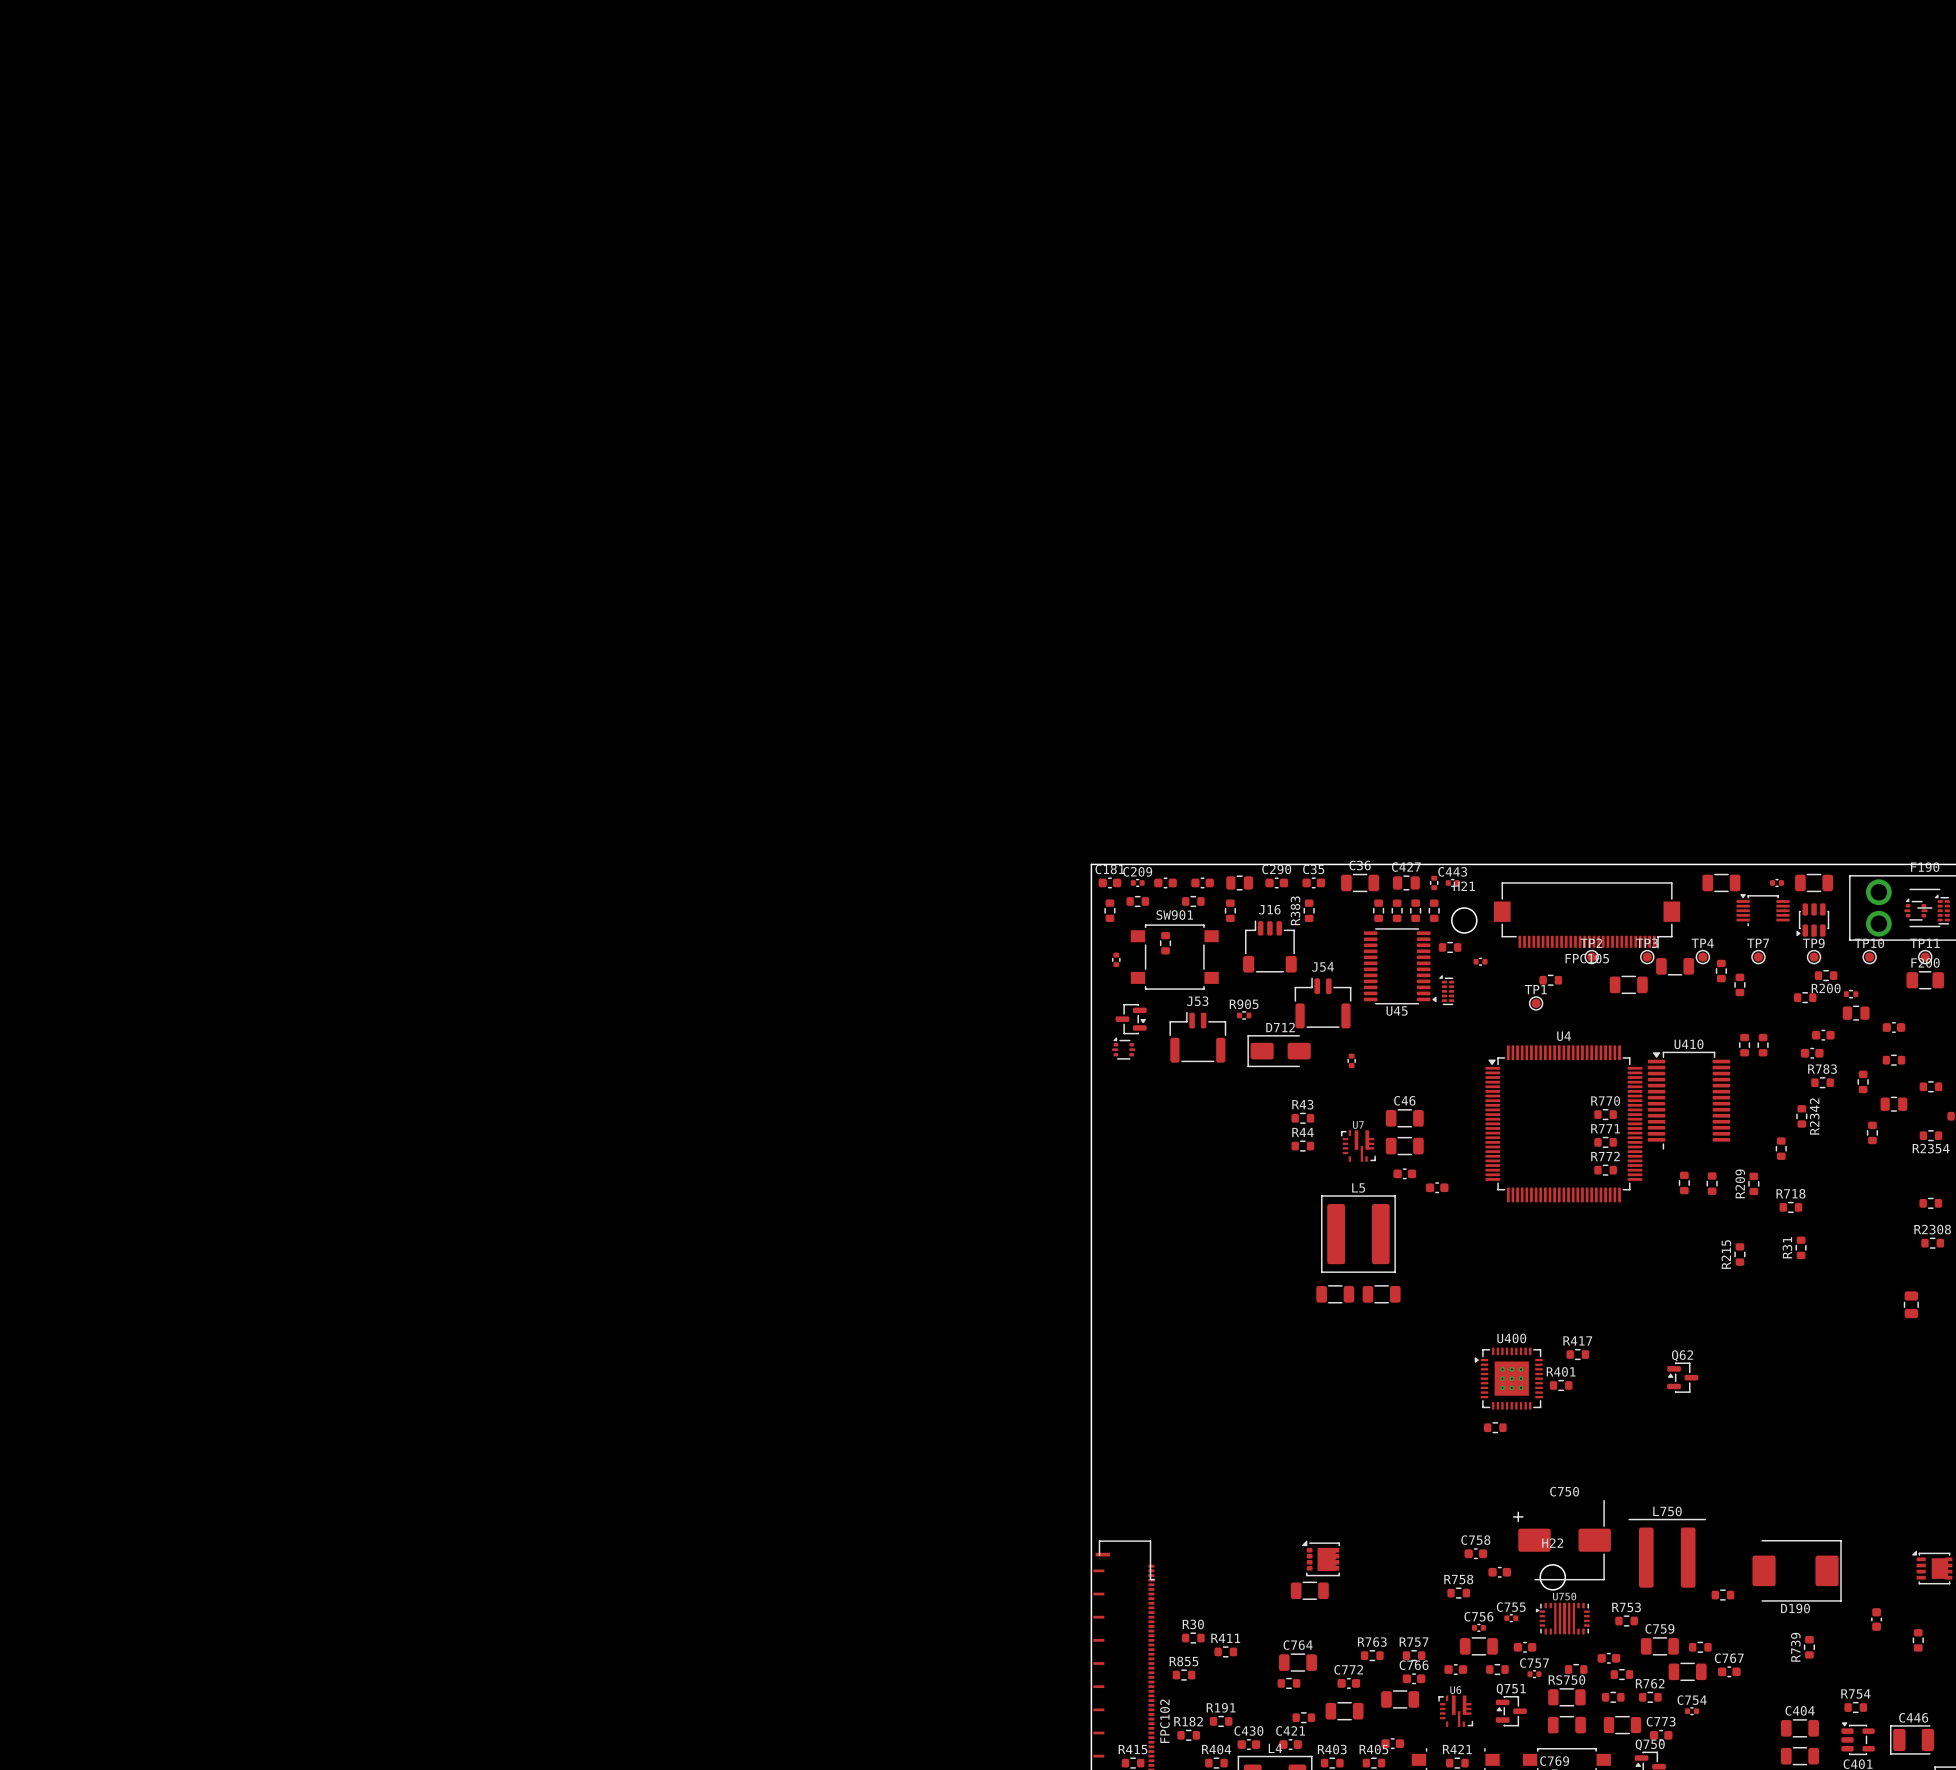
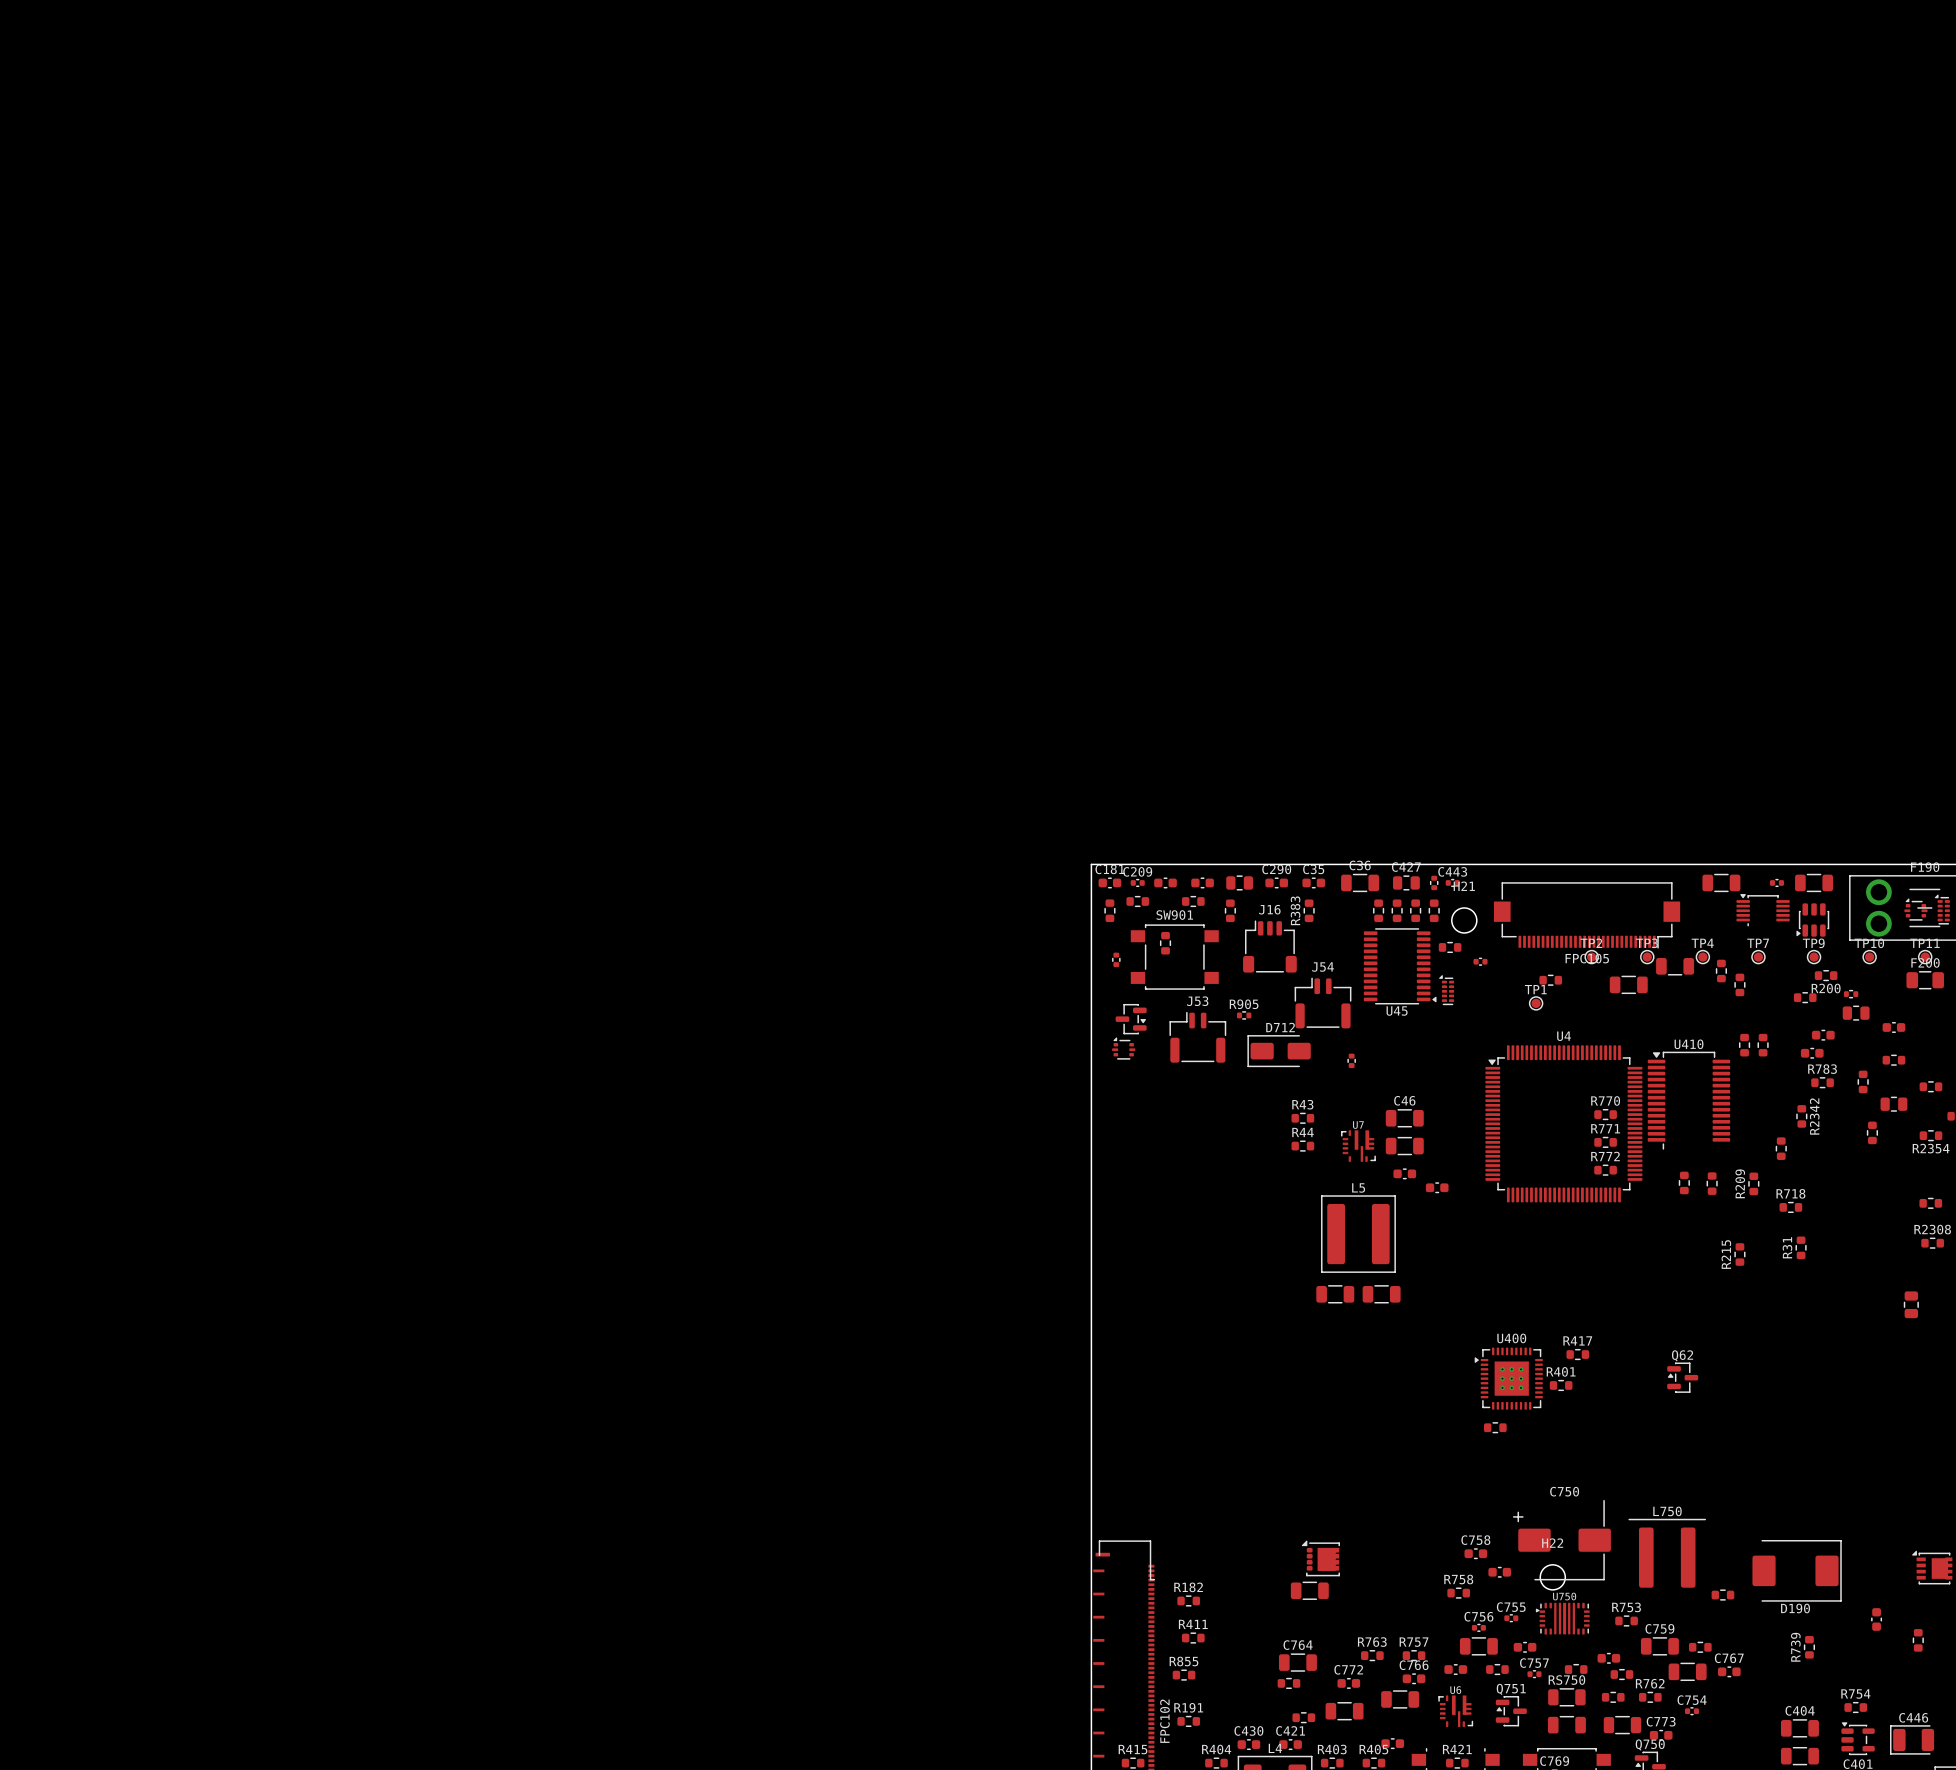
R30 name: R30 (1193, 1624) -> R411 (1193, 1624)
R411: (1225, 1651) -> none
R191 position: (1221, 1721) -> (1188, 1721)
R182 position: (1188, 1735) -> (1188, 1600)

